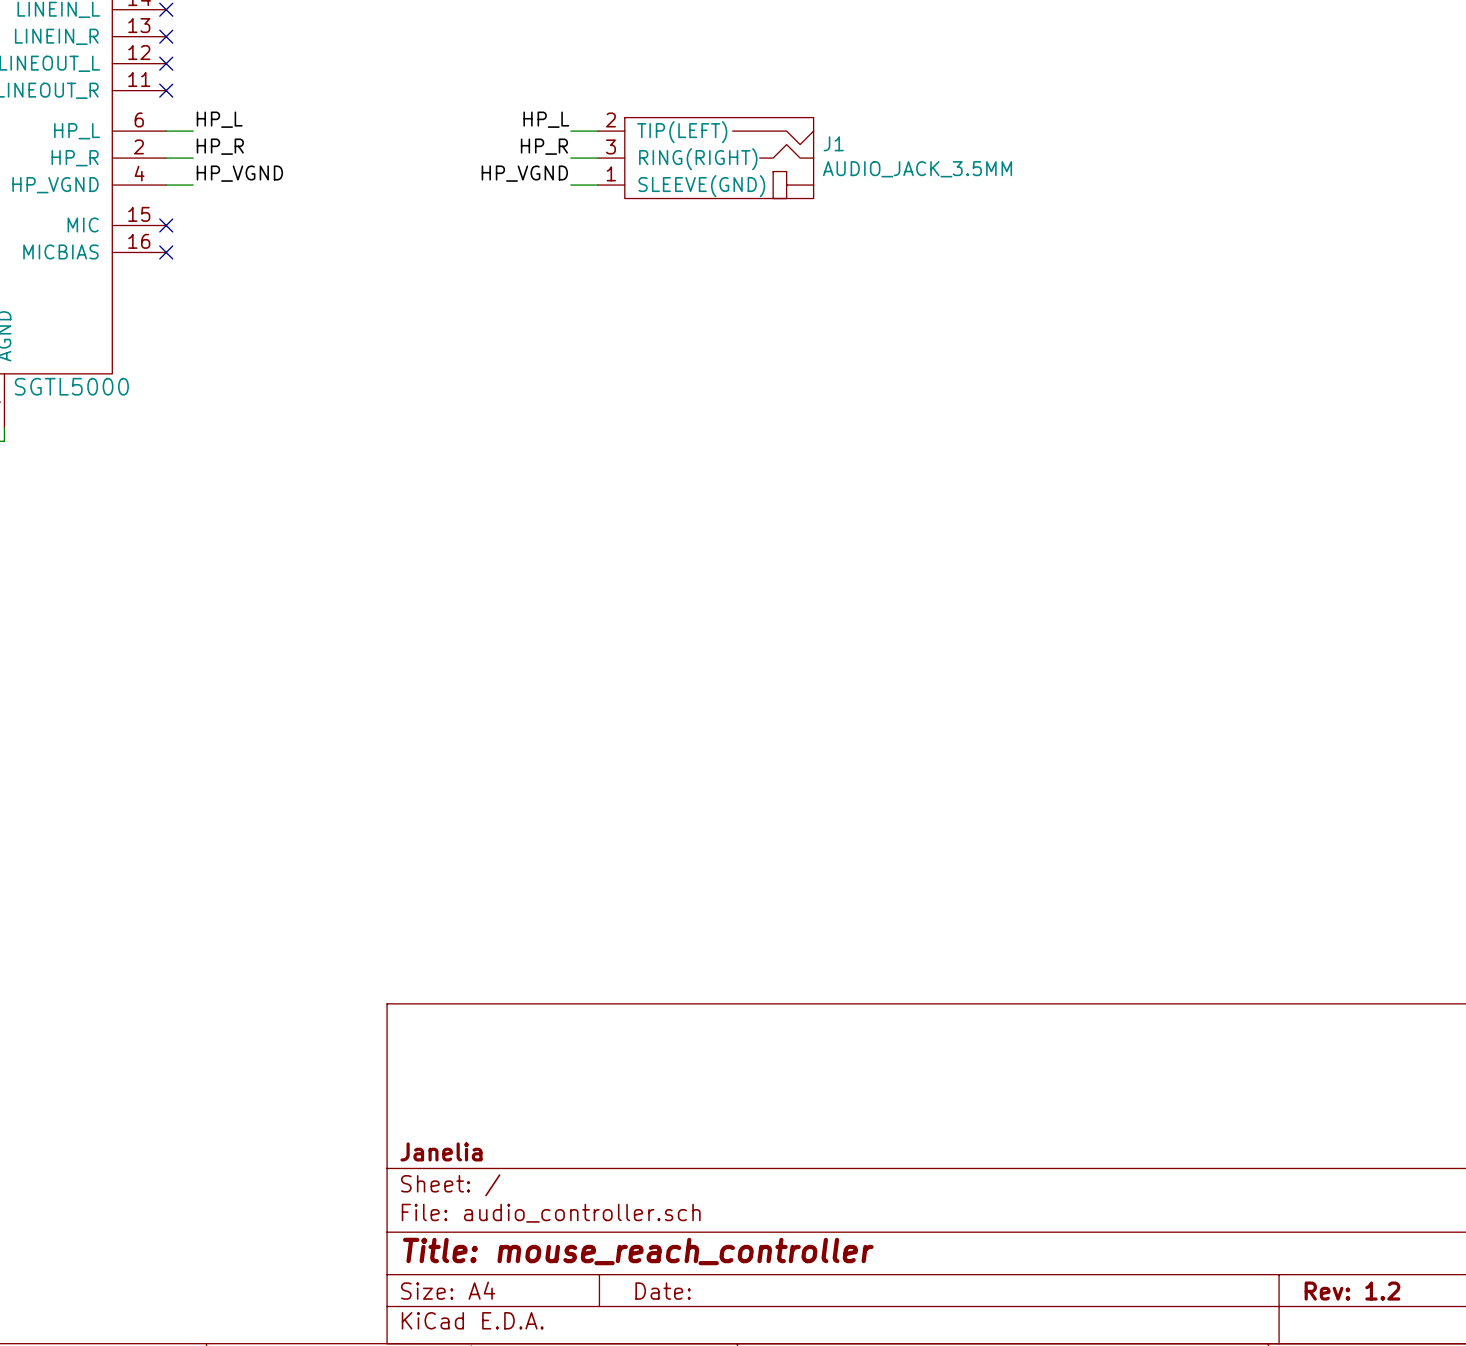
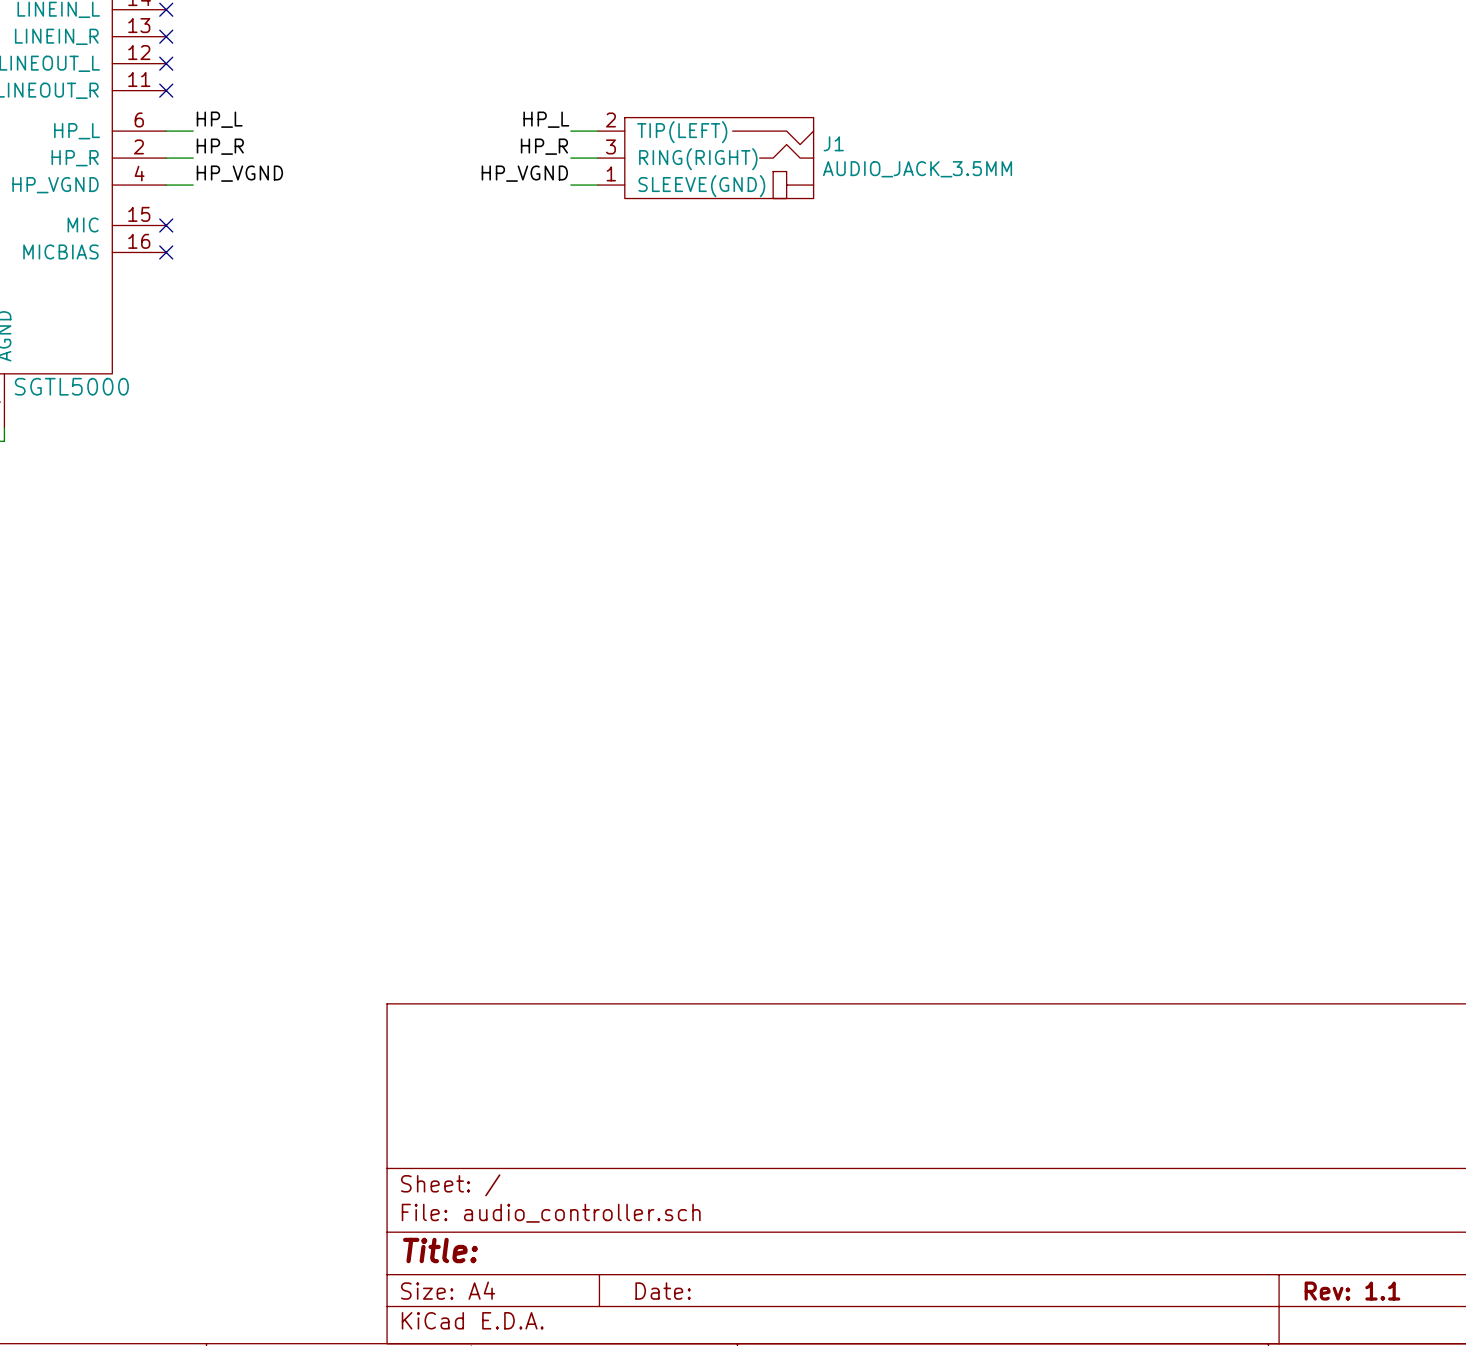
title block: Janelia (441, 1151) -> none
title block: Title: mouse_reach_controller (638, 1251) -> Title: (440, 1250)
title block: Rev: 1.2 (1352, 1291) -> Rev: 1.1 (1352, 1291)

